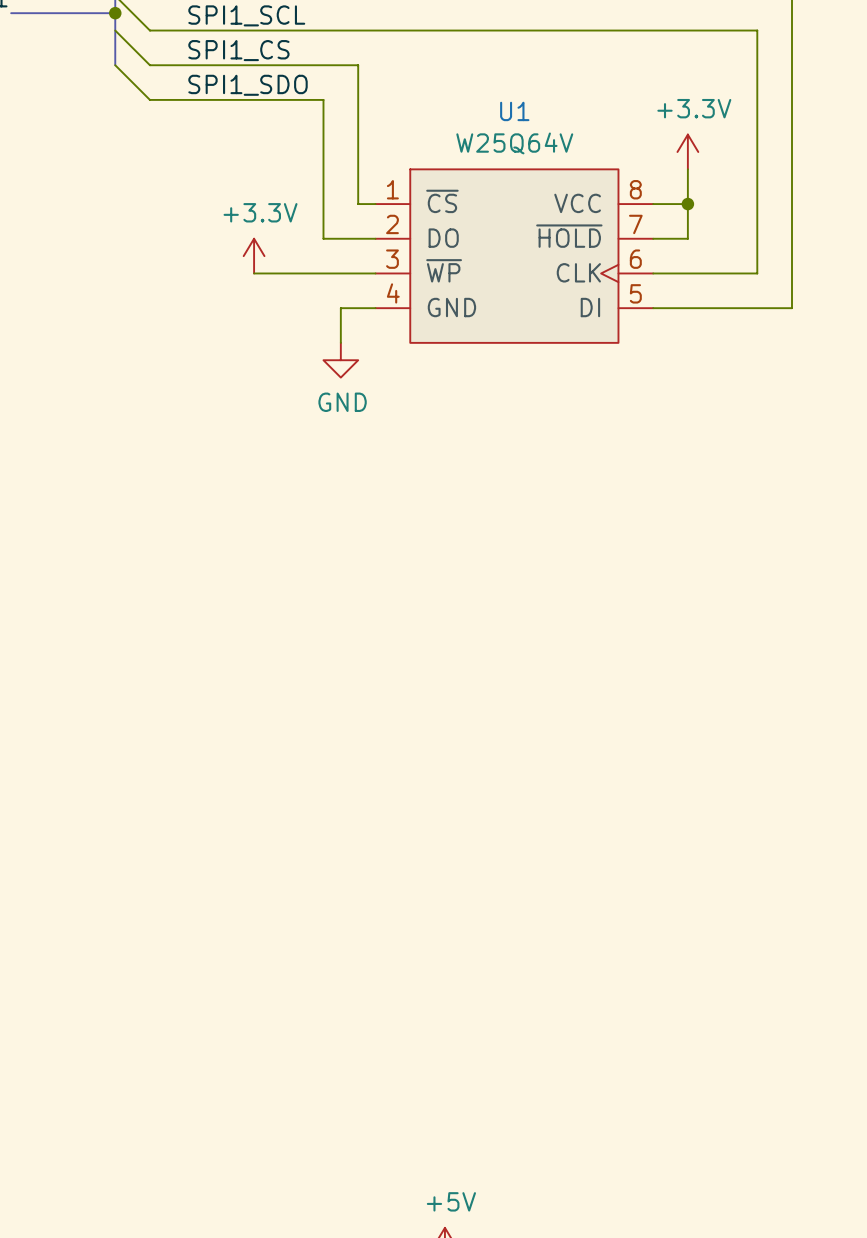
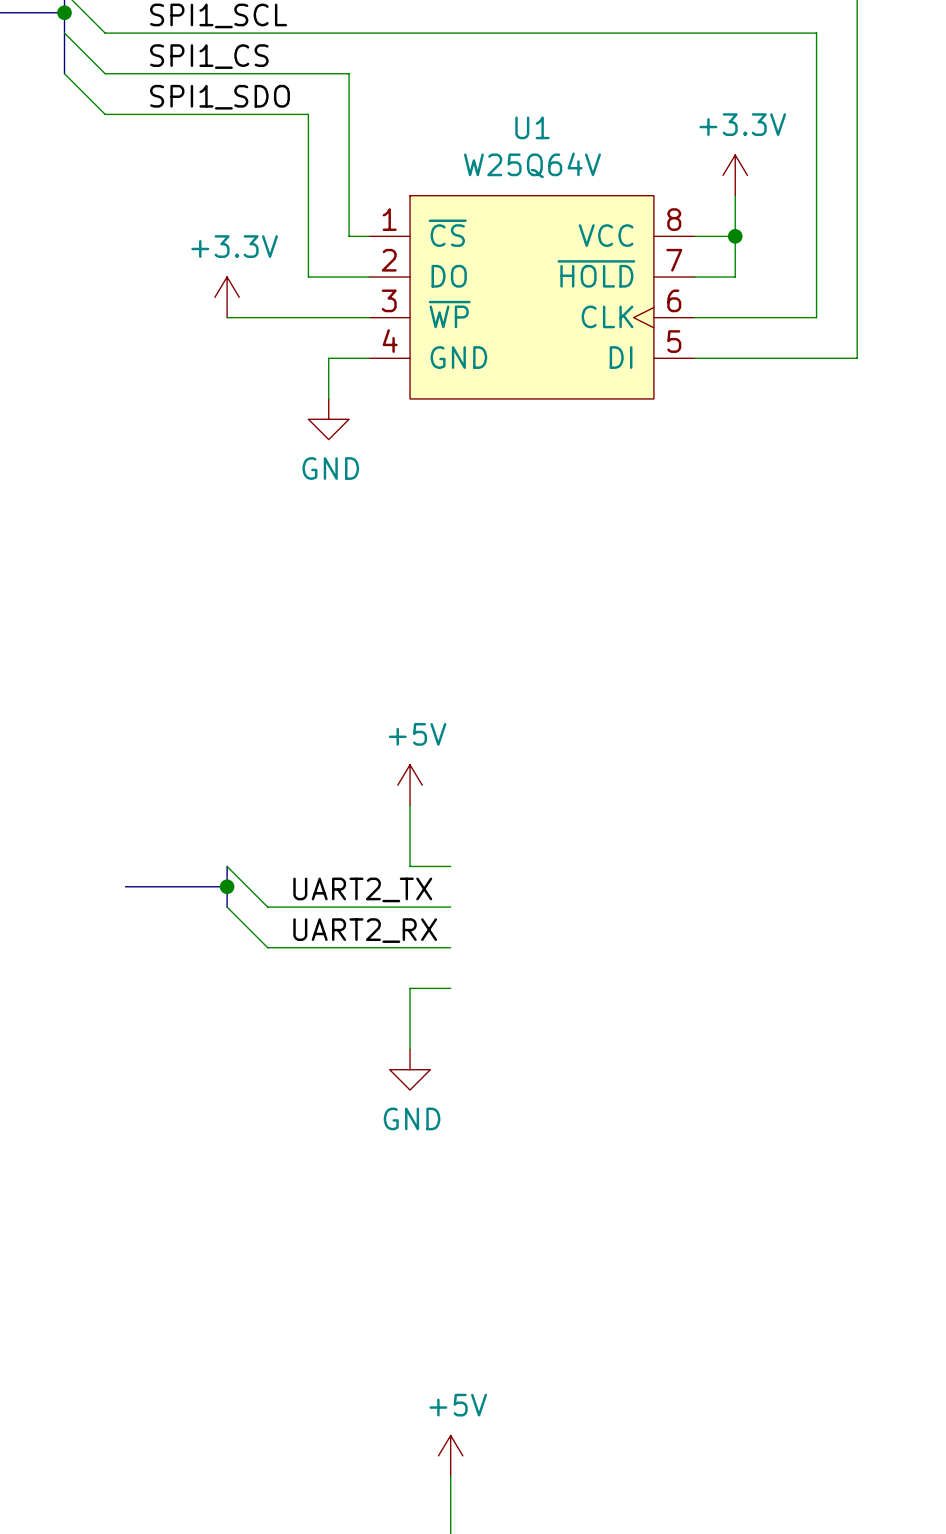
power symbol: none -> +5V (410, 785)
wire: none -> (410, 805) (410, 866) (450, 866)
wire: none -> (227, 866) (267, 907) (450, 907)
bus: none -> (227, 866) (227, 907)
bus: none -> (125, 886) (227, 886)
junction: none -> (227, 886)
label: none -> UART2_TX (362, 889)
wire: none -> (227, 907) (267, 947) (450, 947)
label: none -> UART2_RX (365, 930)
wire: none -> (450, 988) (410, 988) (410, 1049)
power symbol: none -> GND (410, 1069)

